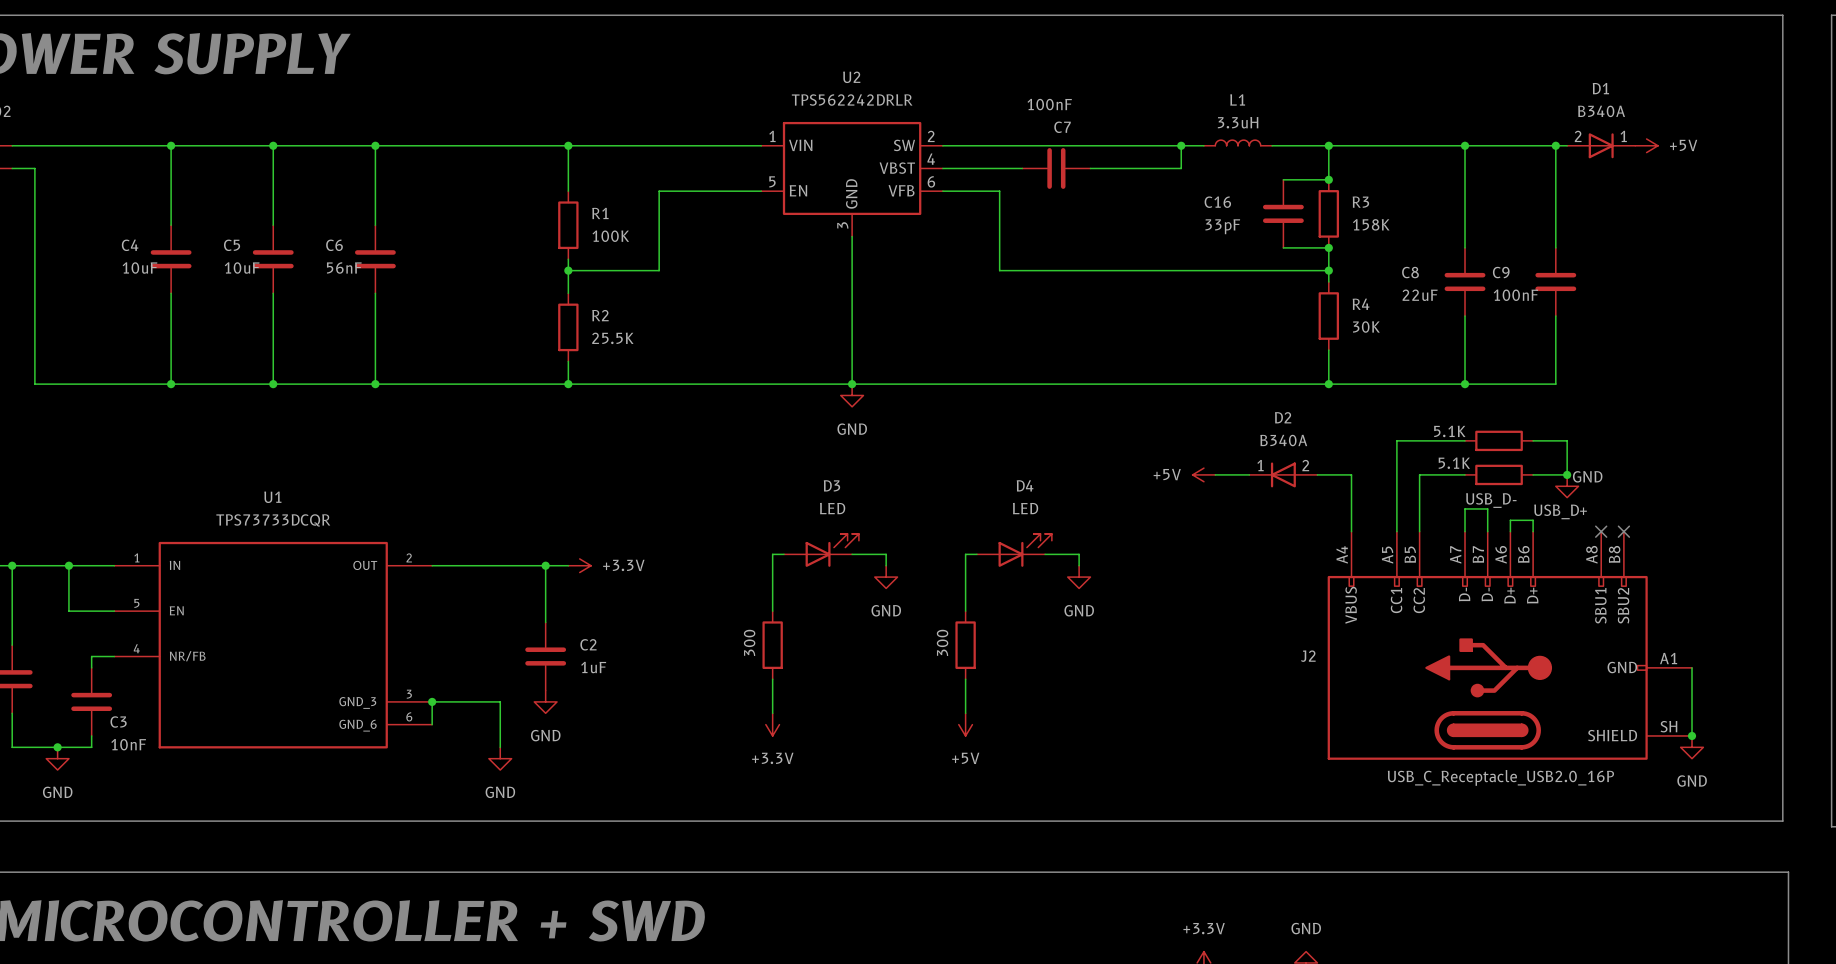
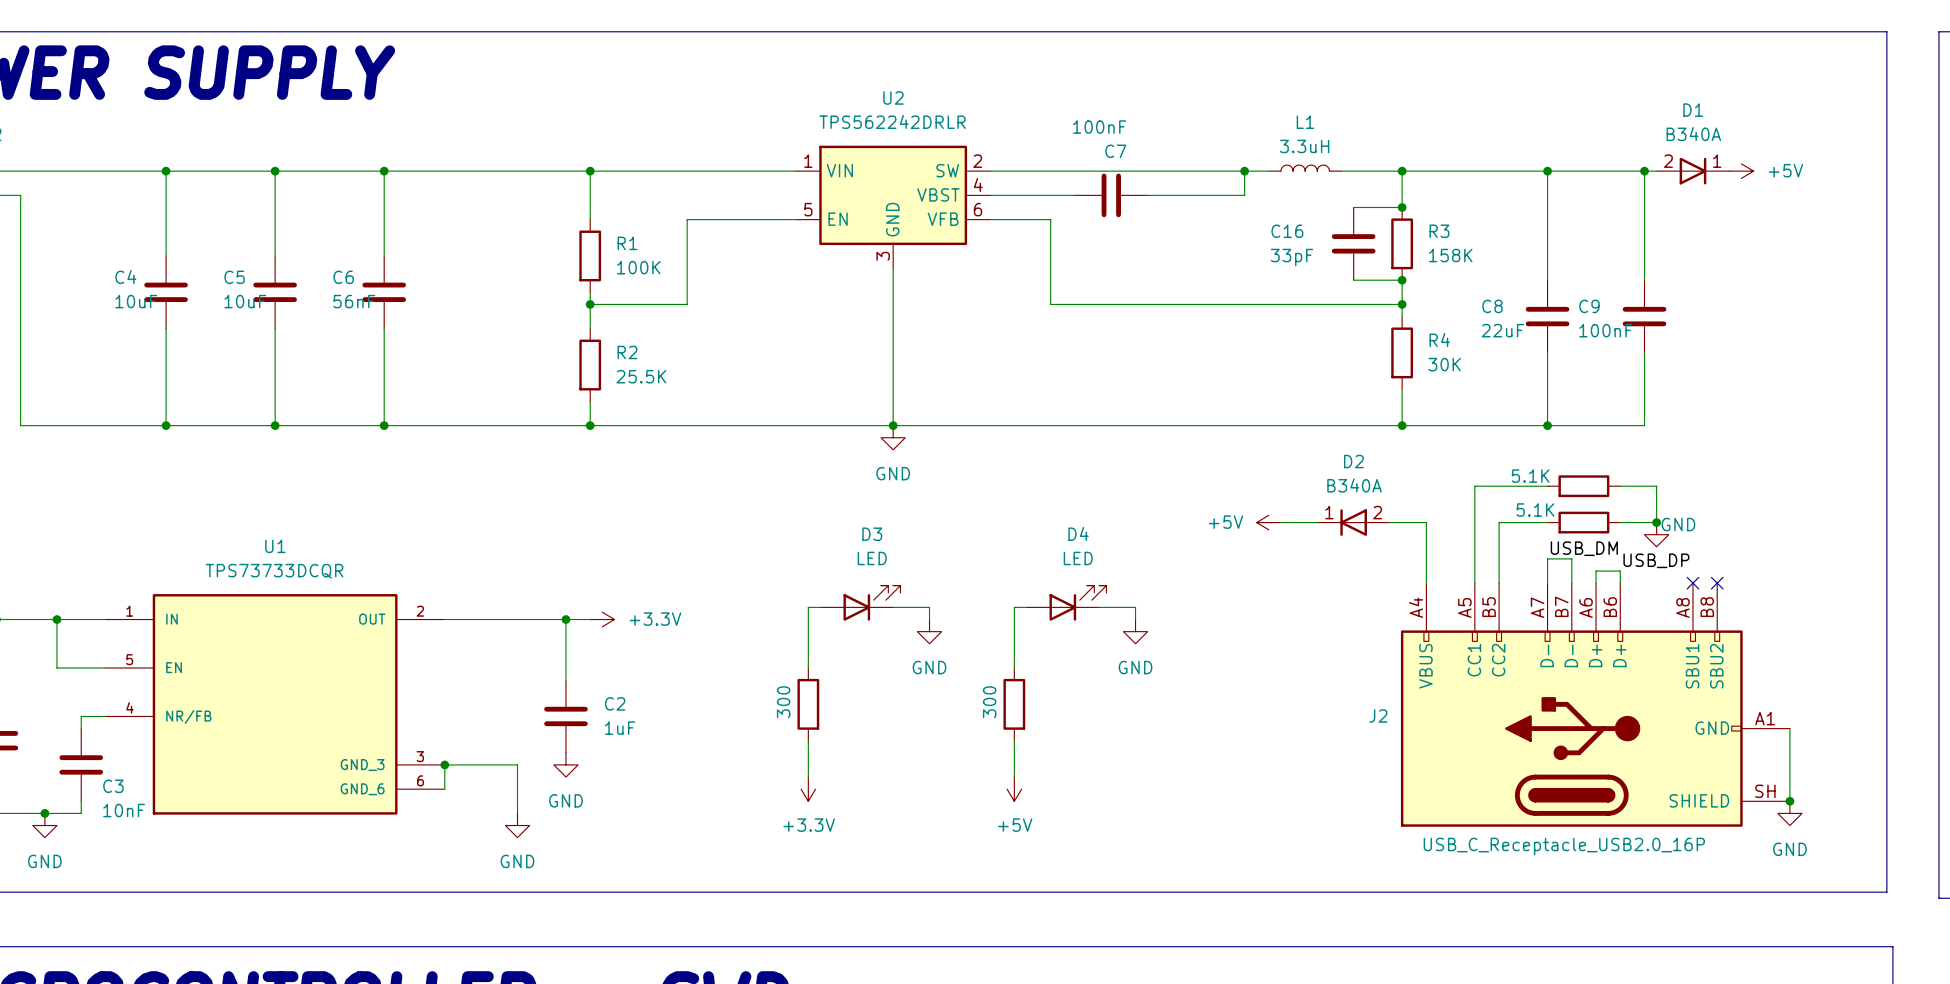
label: USB_D- (1491, 500) -> USB_DM (1584, 548)
label: USB_D+ (1560, 511) -> USB_DP (1656, 560)

